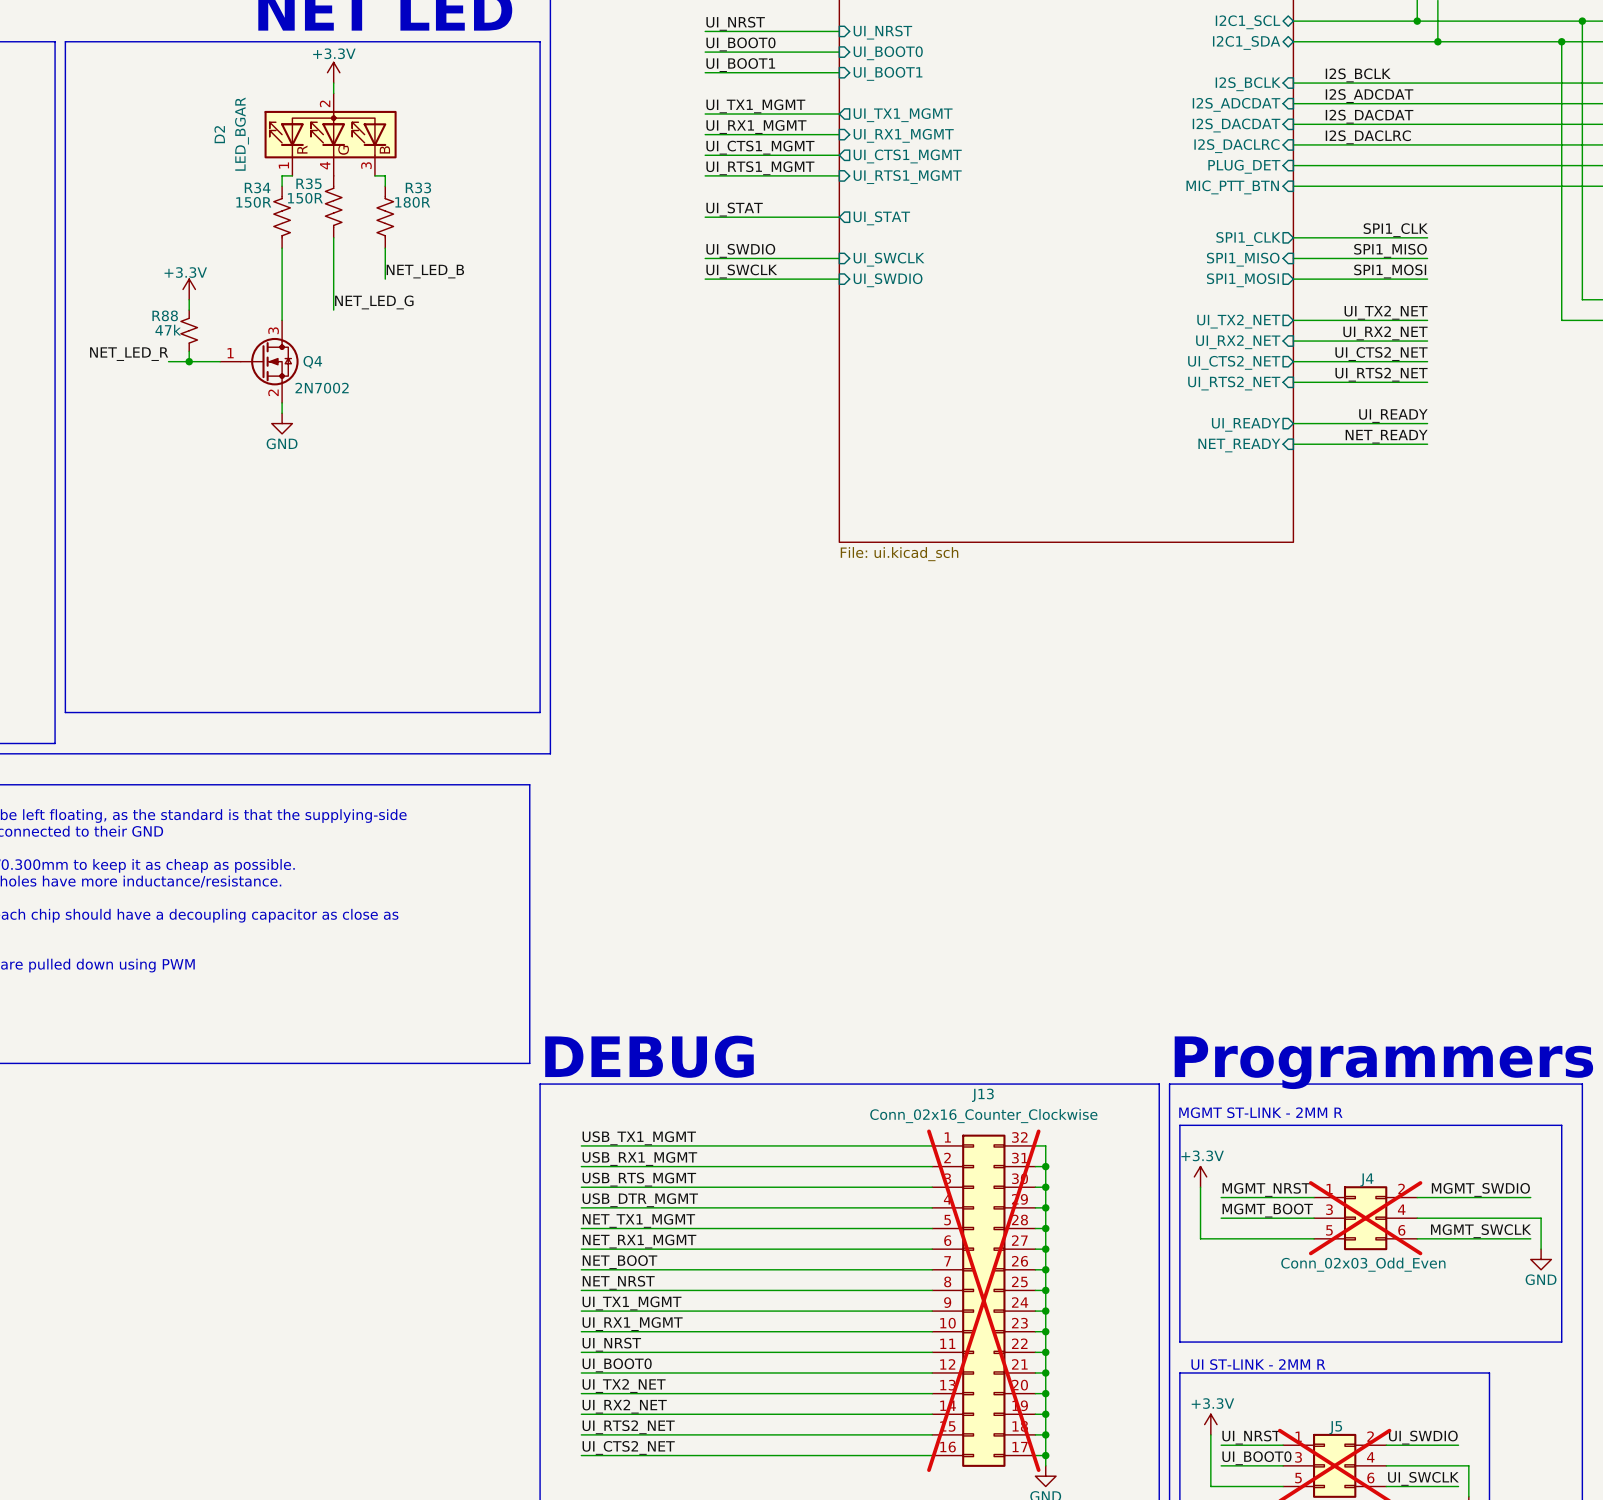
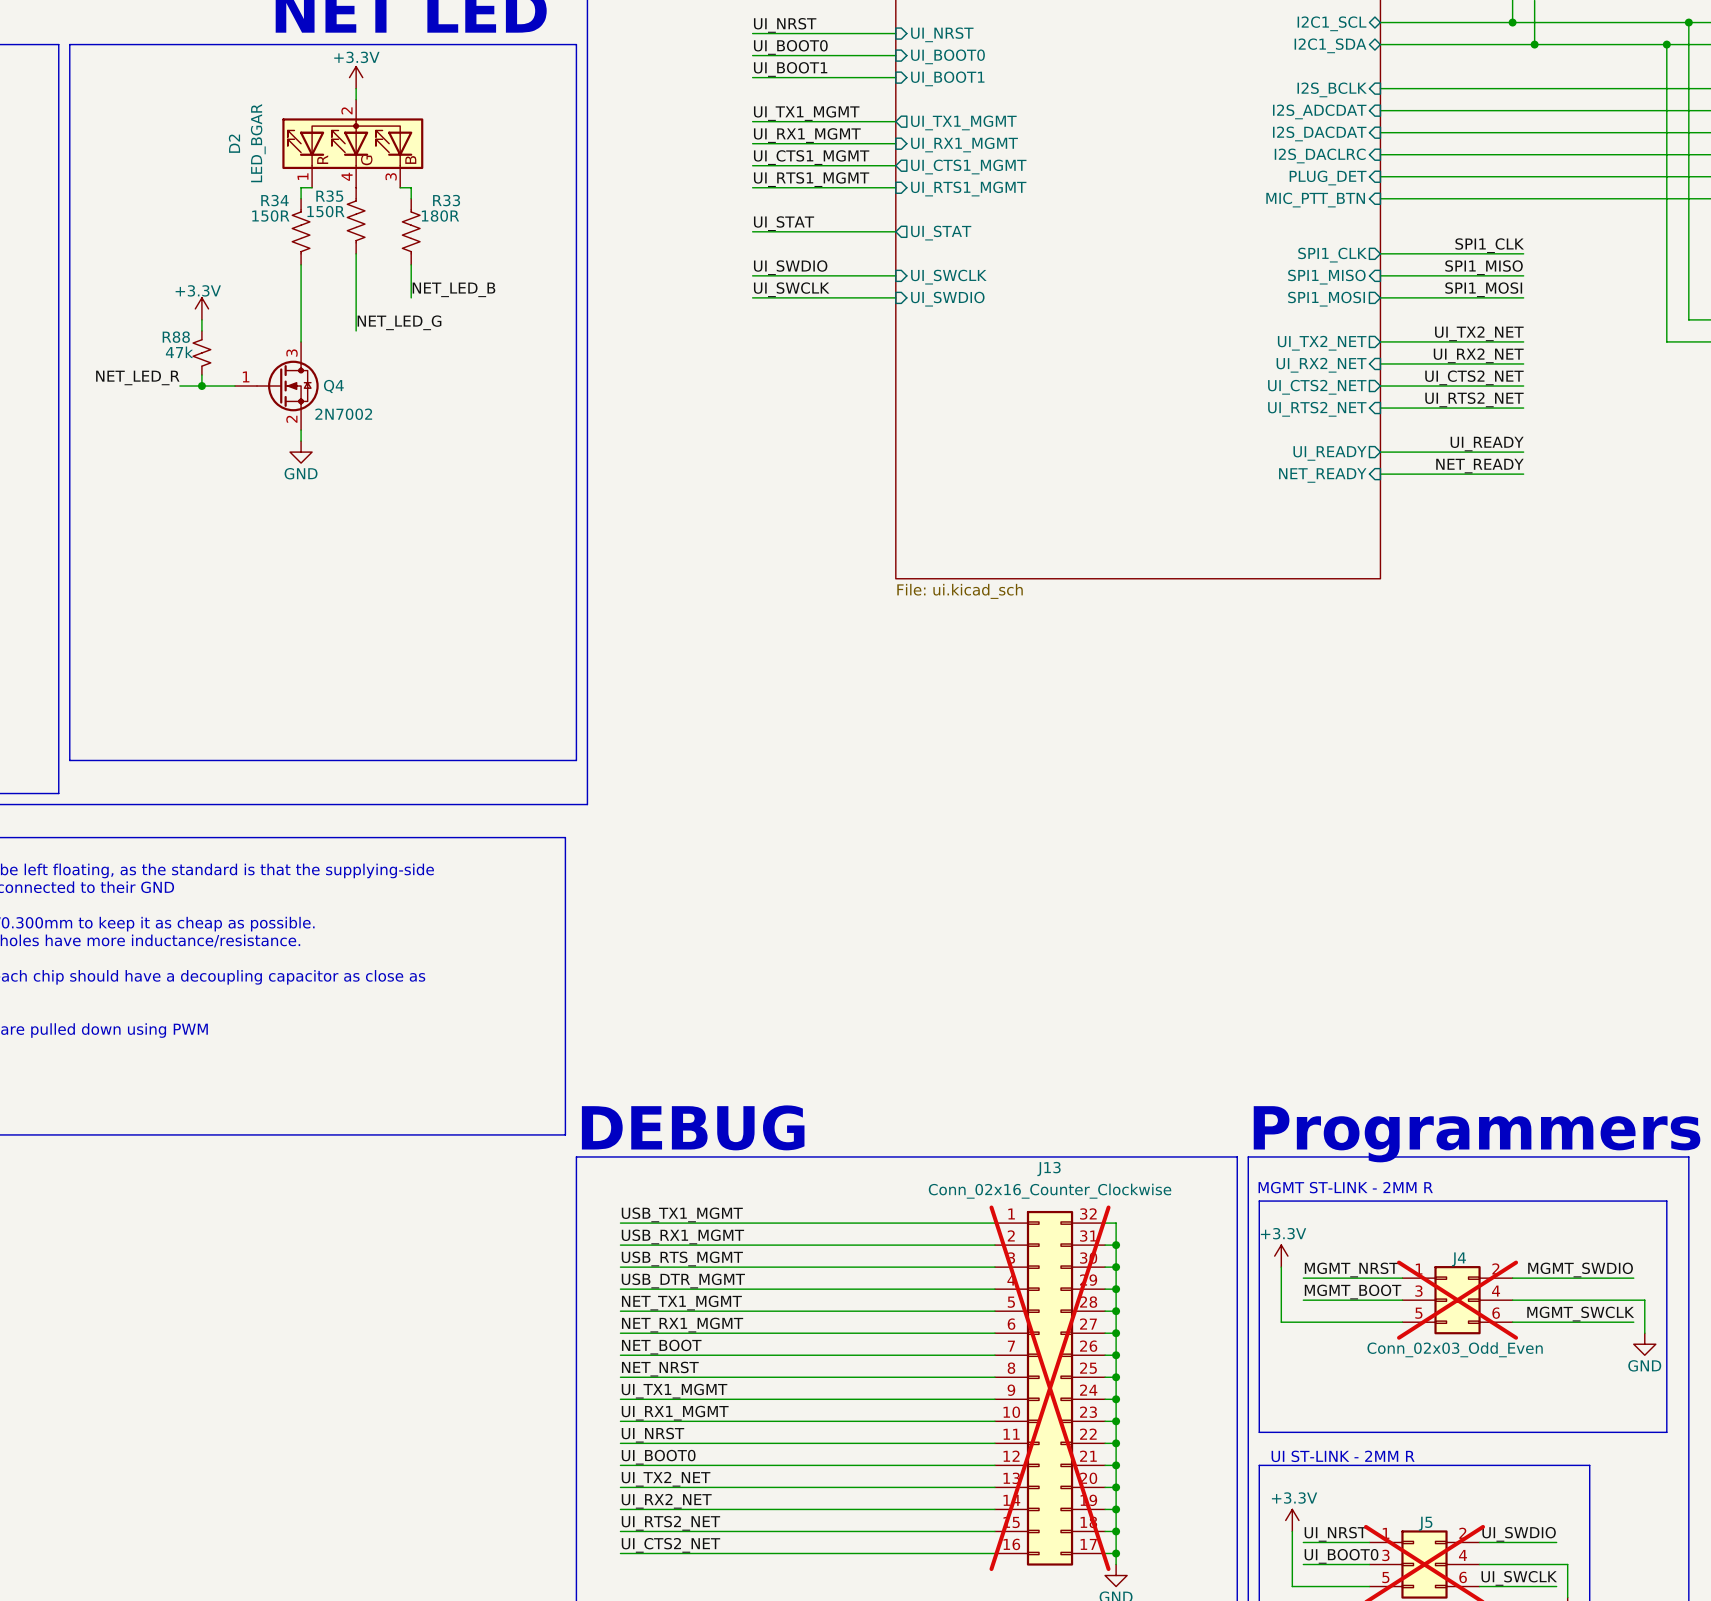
label: I2S_BCLK (1358, 75) -> none
label: I2S_ADCDAT (1369, 96) -> none
label: I2S_DACDAT (1369, 116) -> none
label: I2S_DACLRC (1368, 137) -> none

